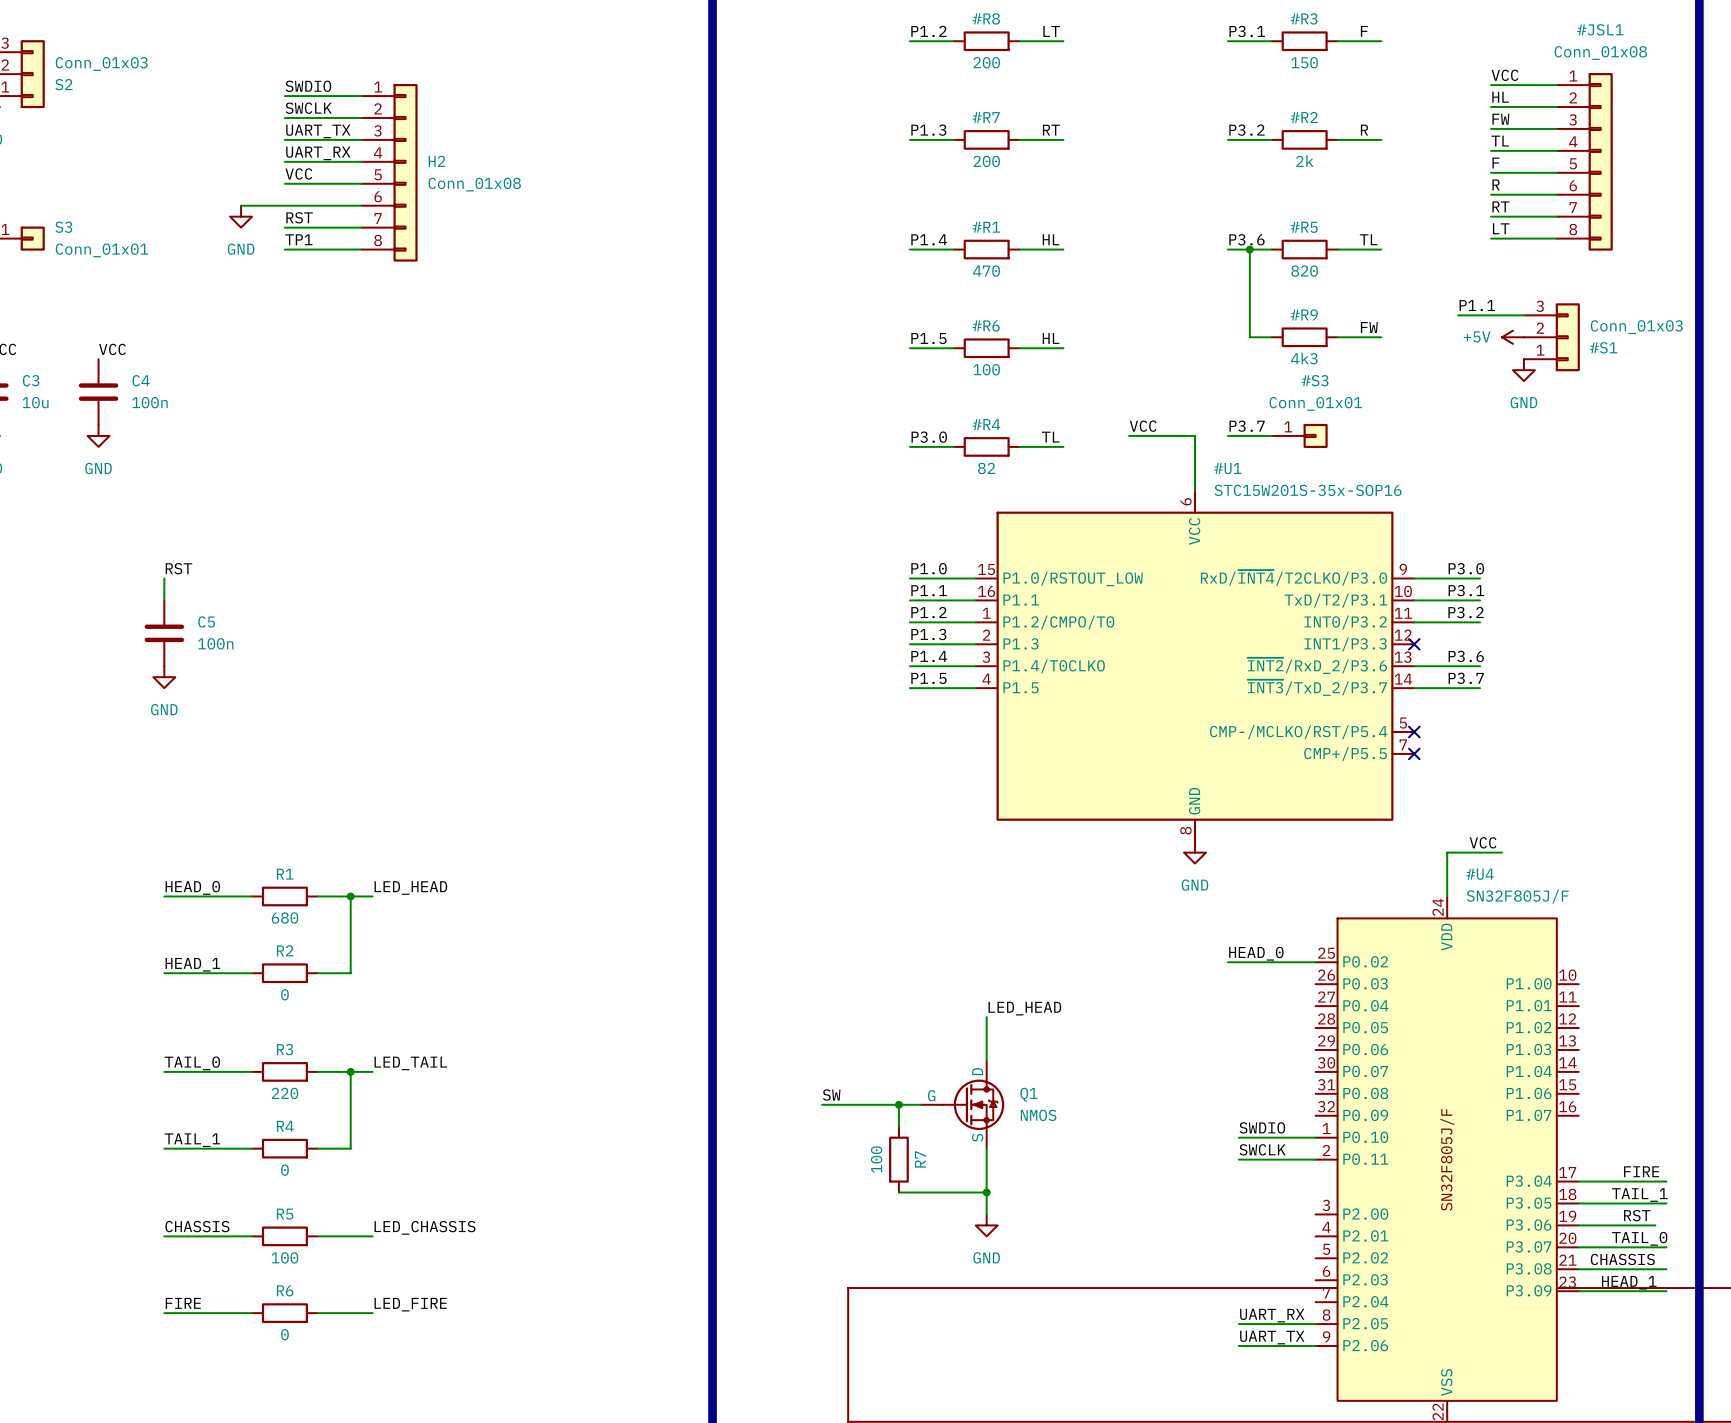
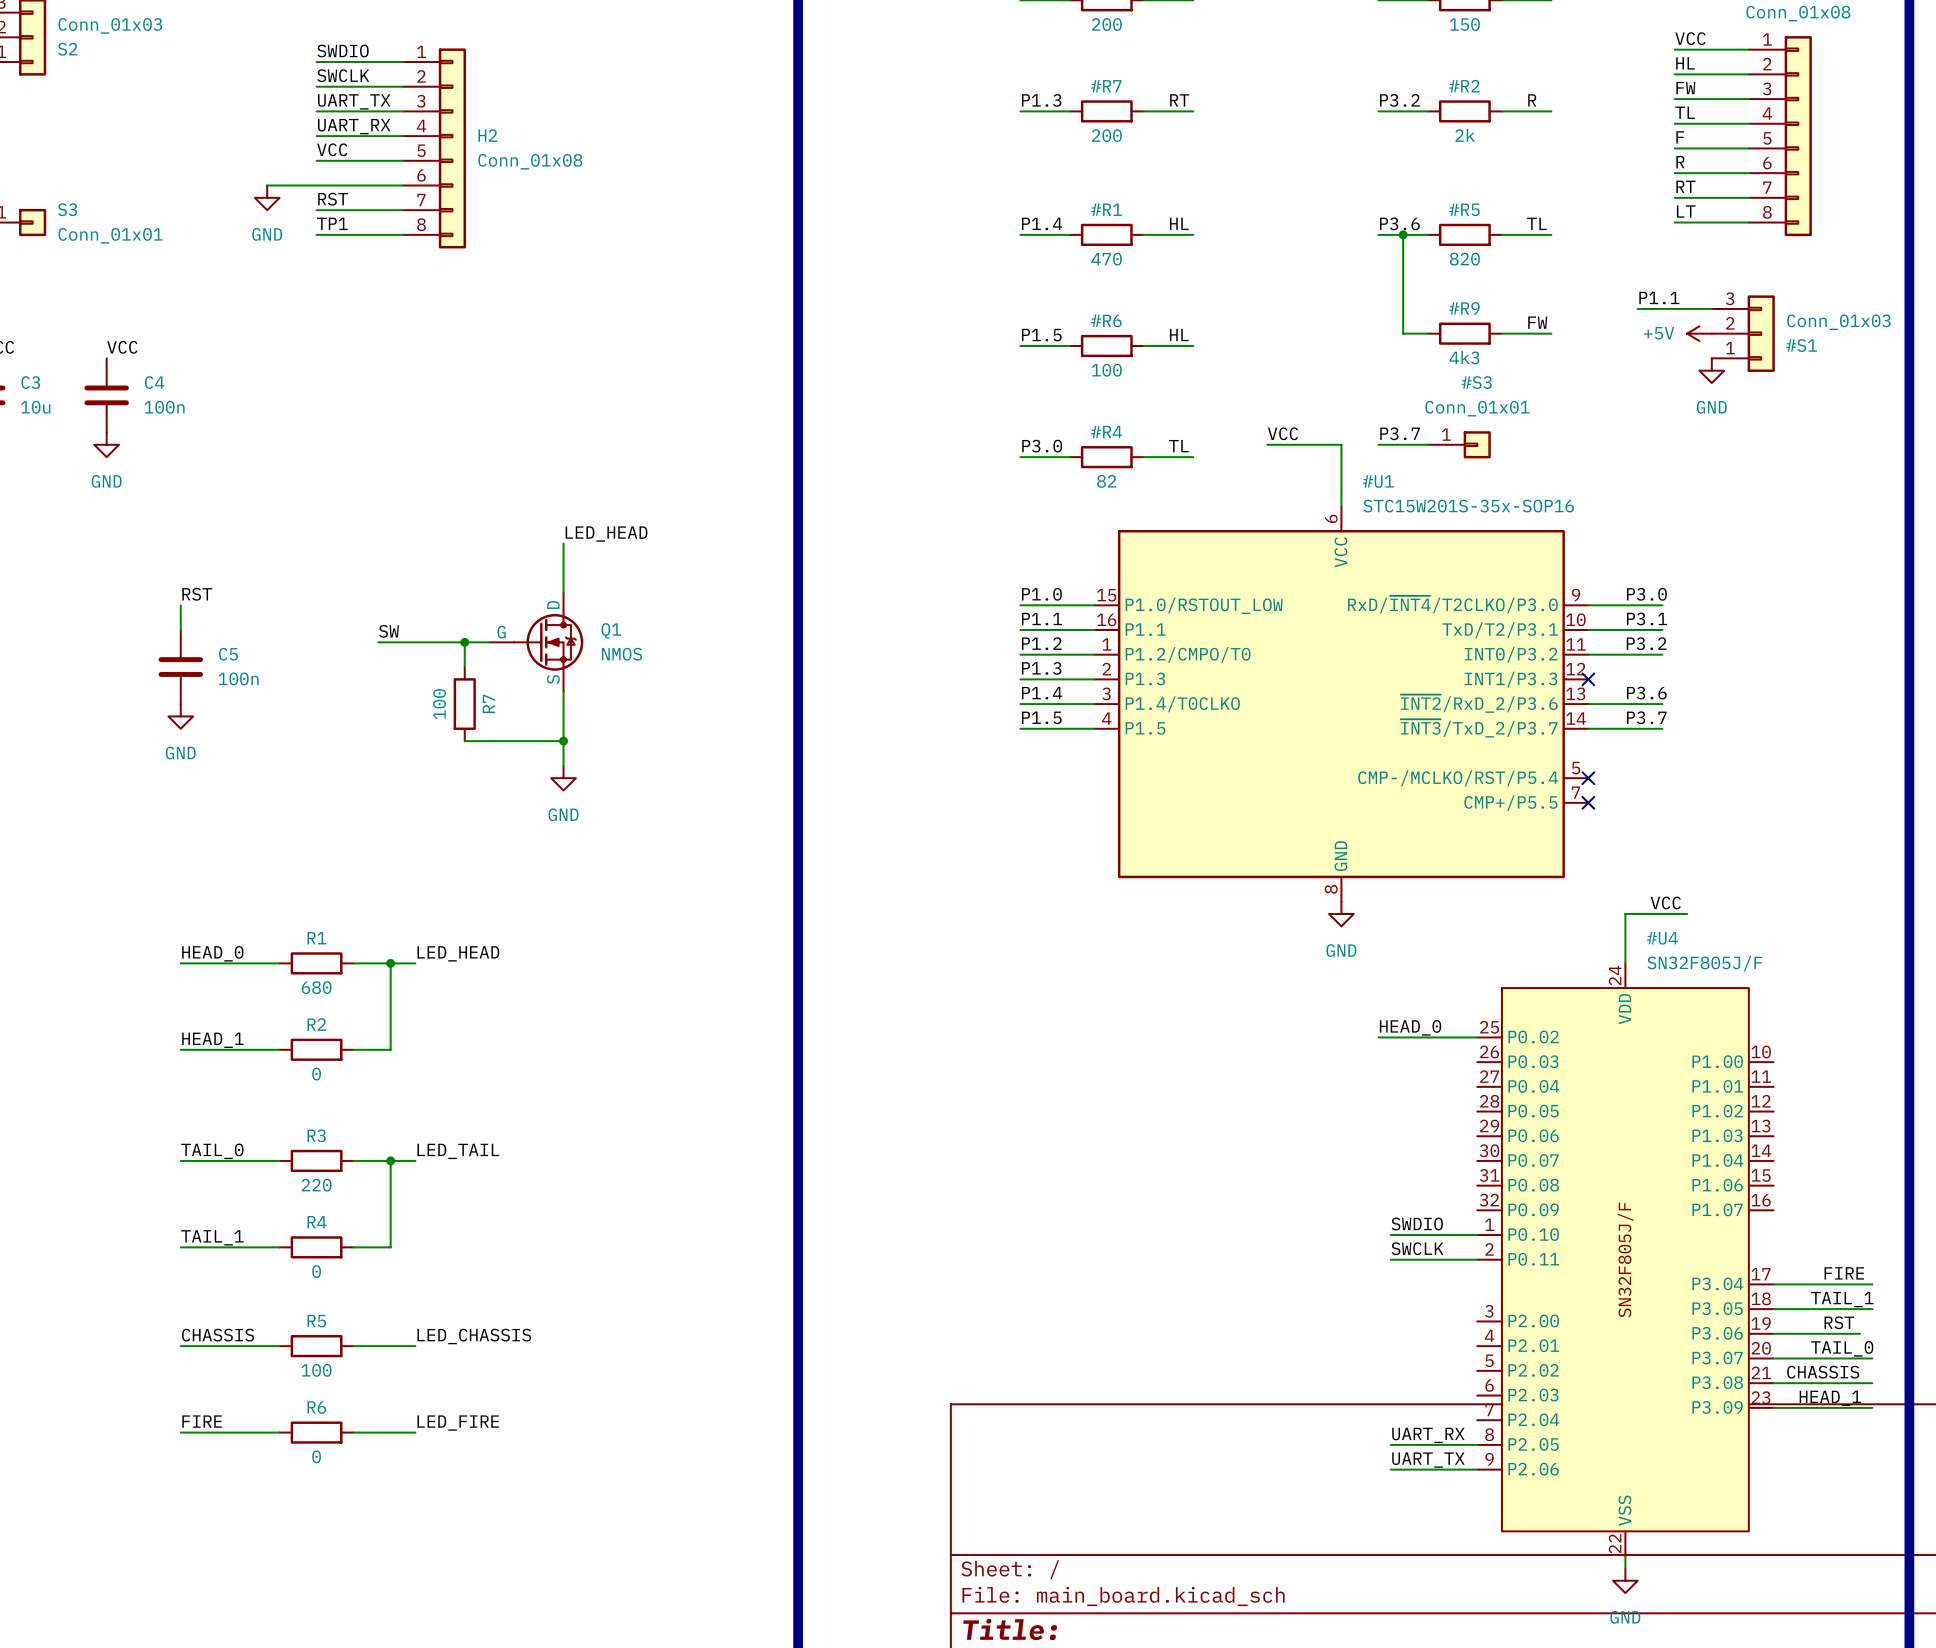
label: none -> LED_HEAD (606, 534)
wire: none -> (563, 543) (563, 592)
label: none -> SW (389, 631)
wire: none -> (378, 642) (489, 642)
wire: none -> (464, 642) (464, 667)
junction: none -> (464, 642)
wire: none -> (563, 691) (563, 765)
wire: none -> (464, 741) (563, 741)
junction: none -> (563, 741)
power symbol: none -> GND (563, 778)
label: LED_HEAD (1024, 1008) -> none
wire: (986, 1017) (986, 1060) -> none
label: SW (831, 1095) -> none
wire: (822, 1104) (920, 1104) -> none
wire: (898, 1104) (898, 1126) -> none
junction: (898, 1104) -> none
Q1 position: (962, 1104) -> (536, 642)
wire: (986, 1148) (986, 1214) -> none
R7 position: (898, 1159) -> (464, 704)
wire: (898, 1192) (986, 1192) -> none
junction: (986, 1192) -> none
power symbol: GND (986, 1225) -> none

